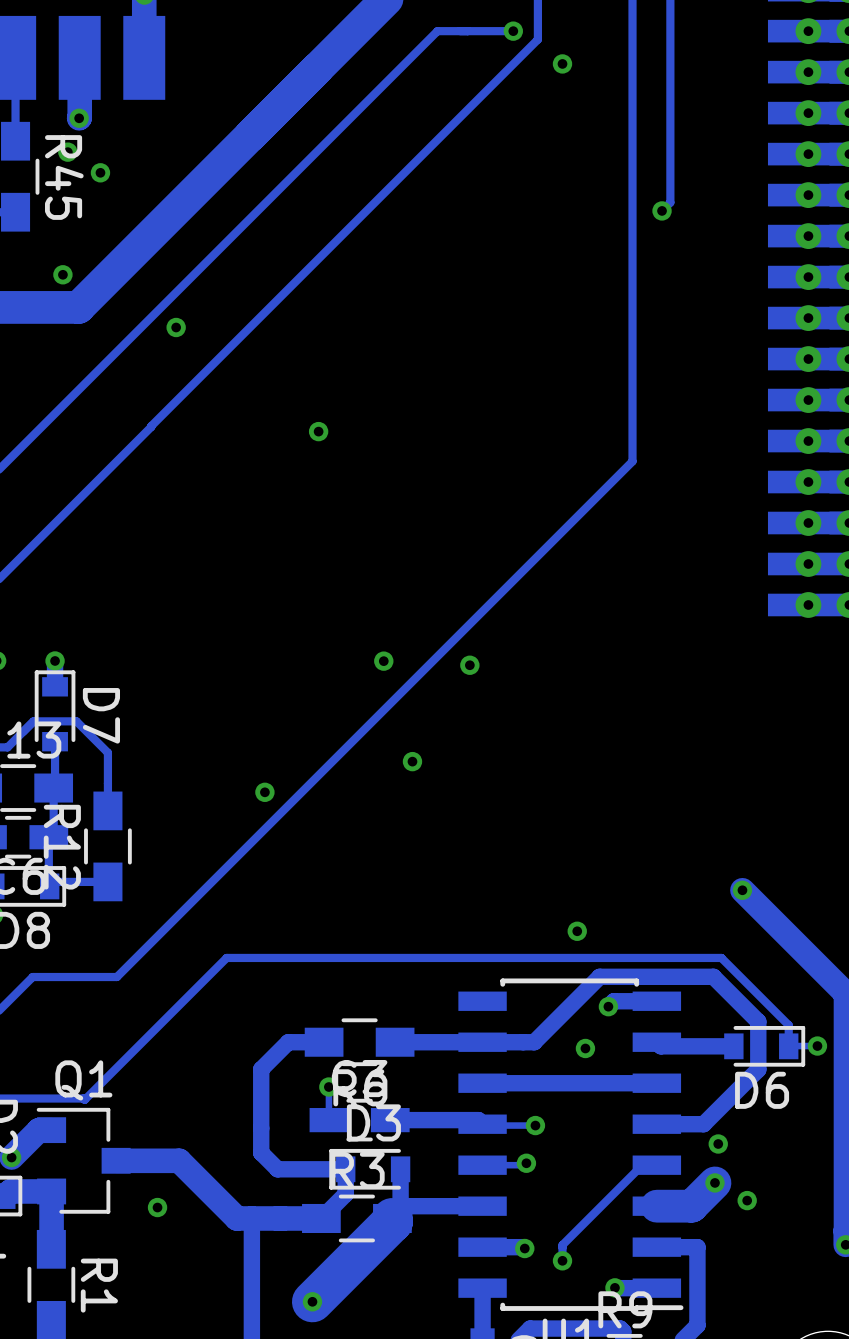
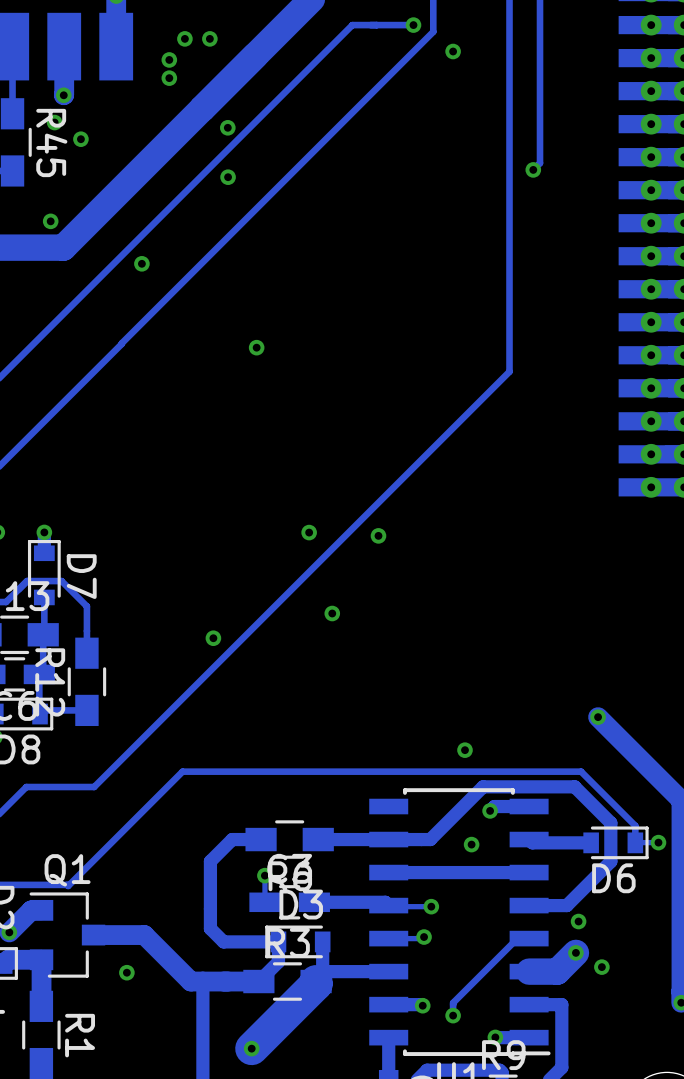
part: none -> (184, 38)
part: none -> (209, 38)
part: none -> (169, 59)
part: none -> (169, 78)
part: none -> (227, 127)
part: none -> (228, 177)

